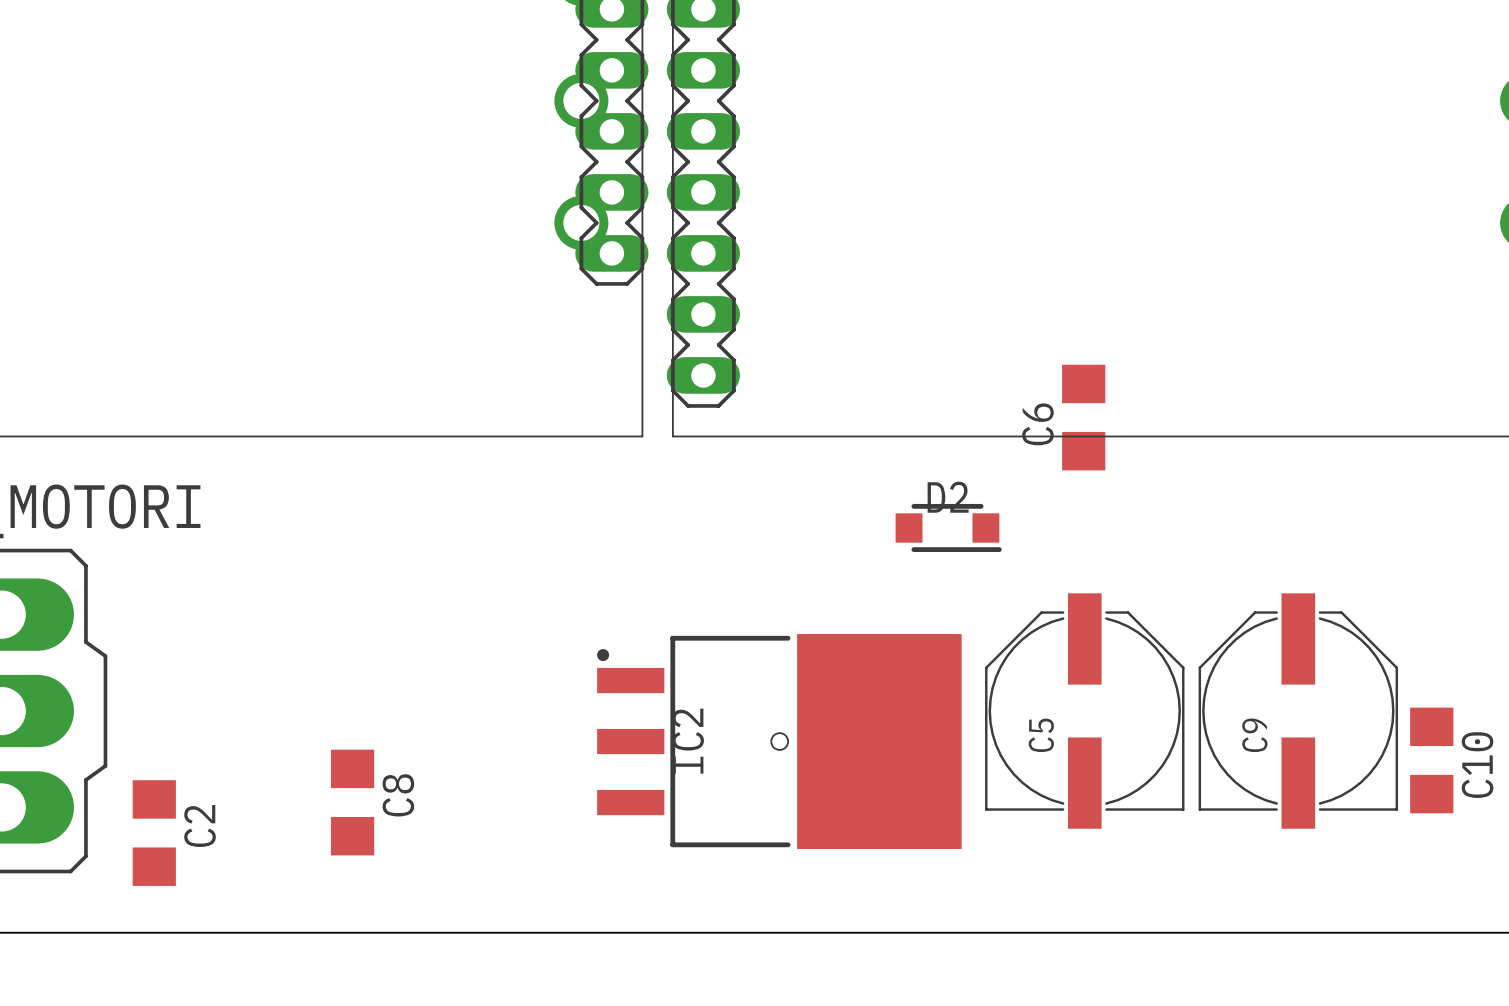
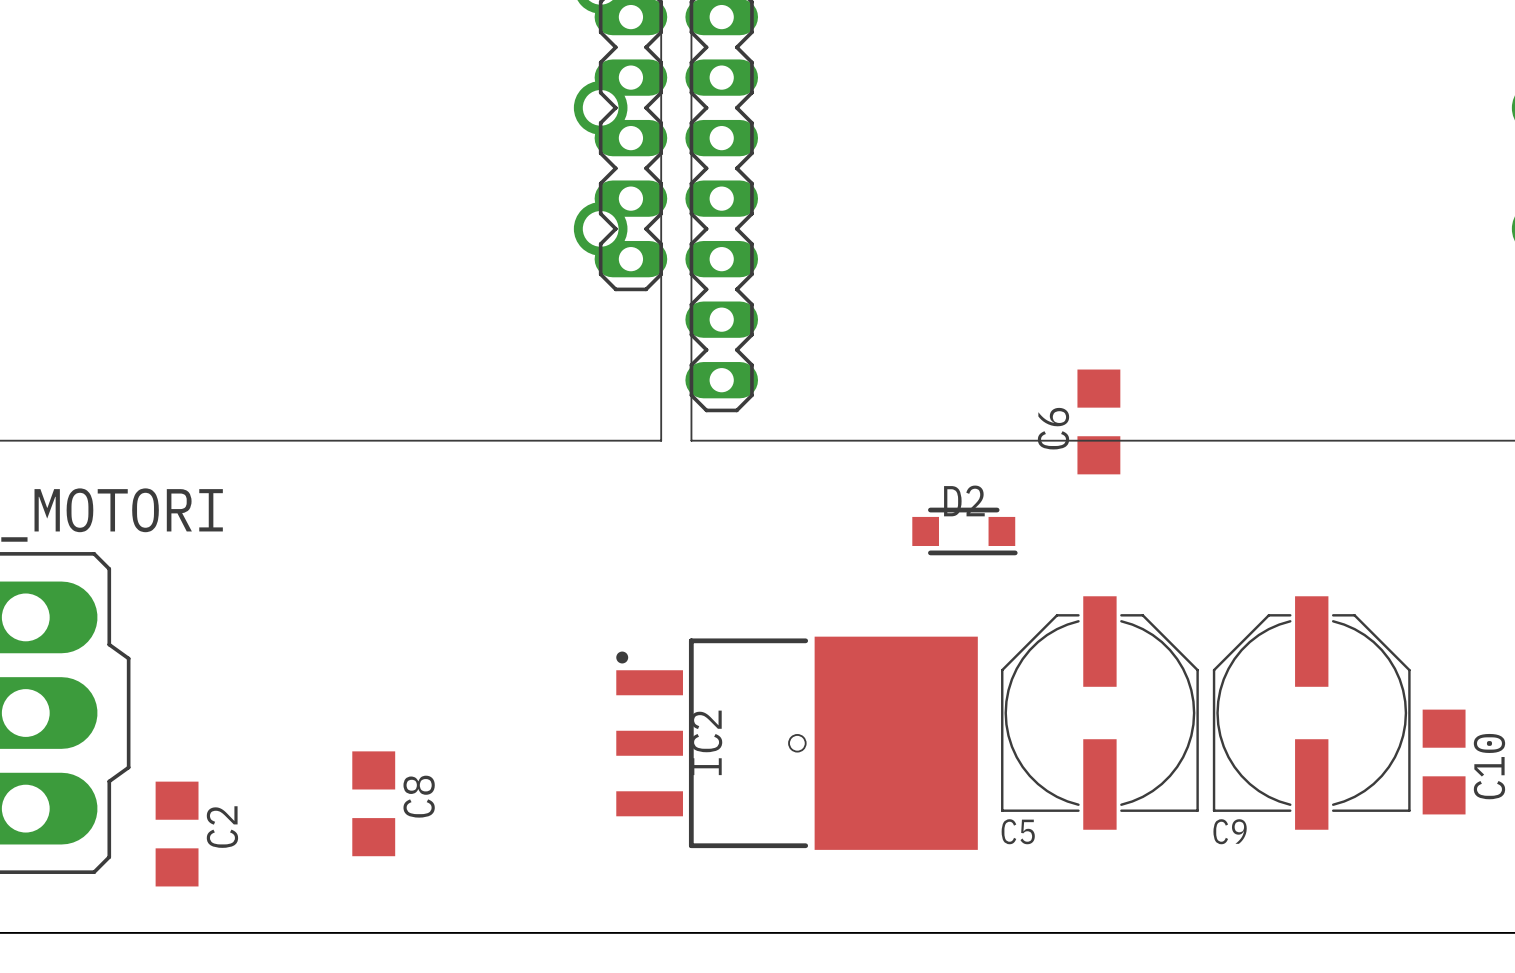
C5 name rotation: 0° (1041, 735) -> 90° clockwise (1018, 831)
C5 name position: C5 (1041, 735) -> C5 (1018, 831)
C9 name rotation: 0° (1254, 735) -> 90° clockwise (1230, 831)
C9 name position: C9 (1254, 735) -> C9 (1230, 831)

